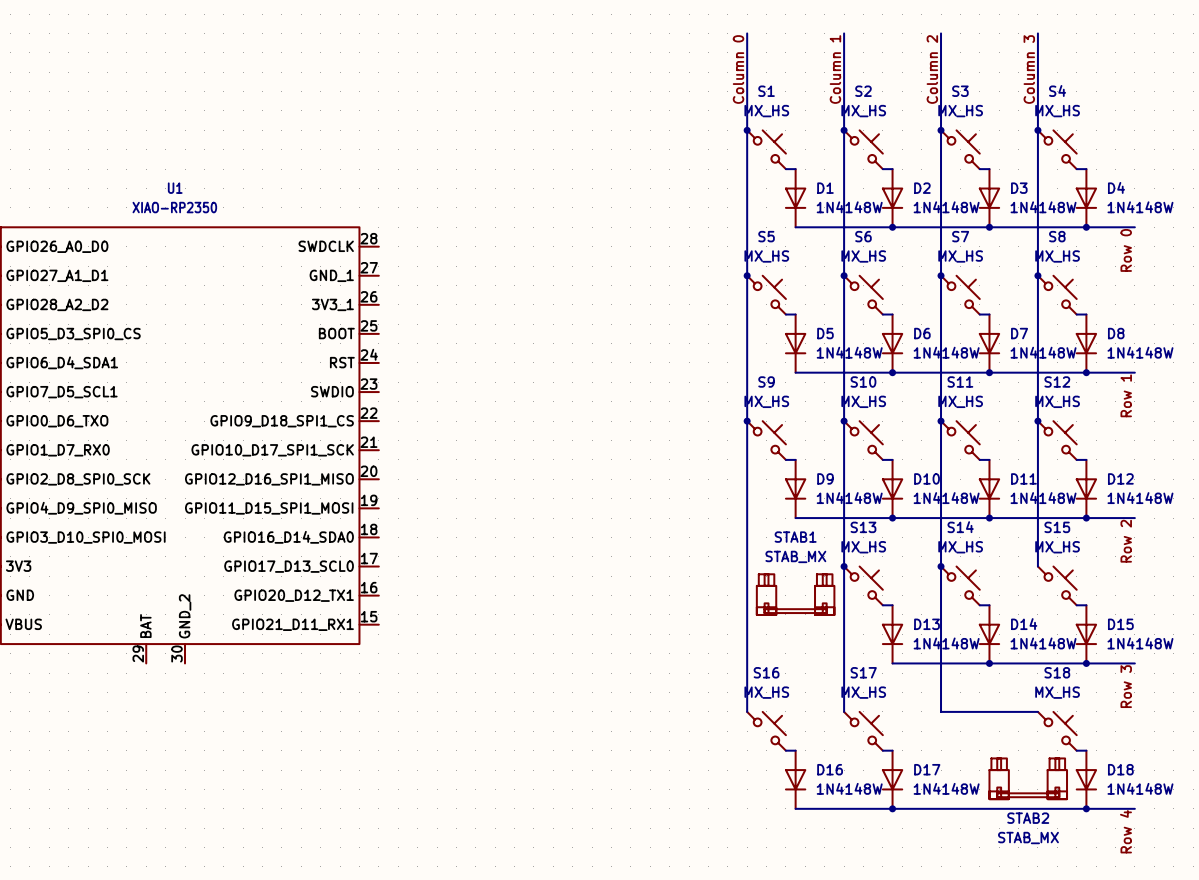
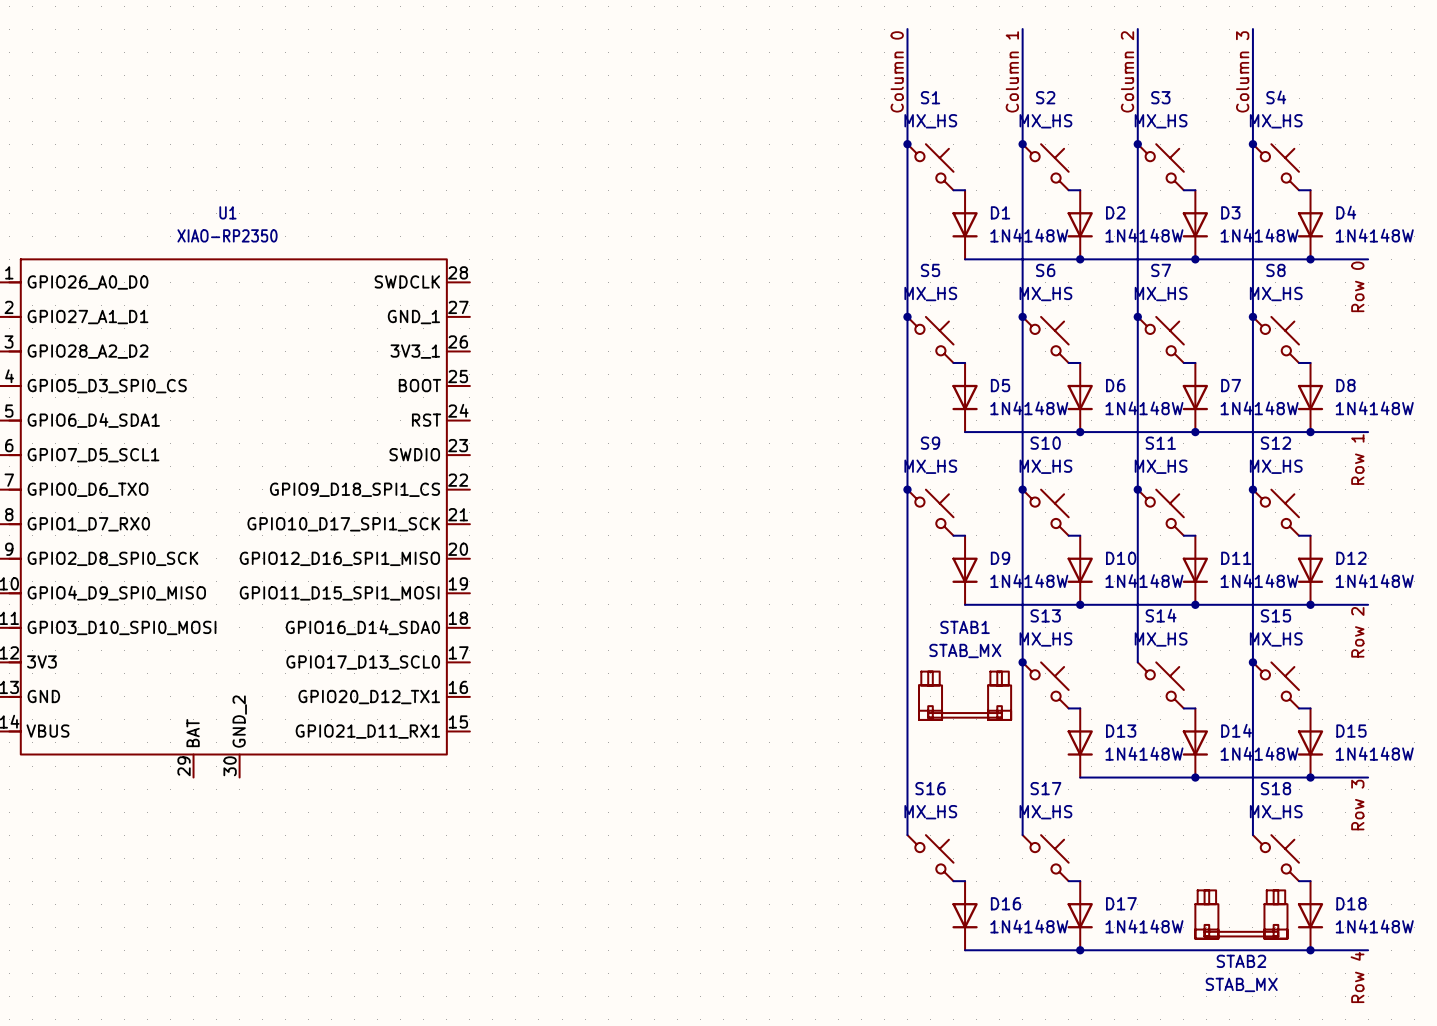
wire: (941, 566) (941, 711) (1037, 711) -> (1252, 662) (1252, 835)
junction: (941, 566) -> none
junction: none -> (1252, 662)

